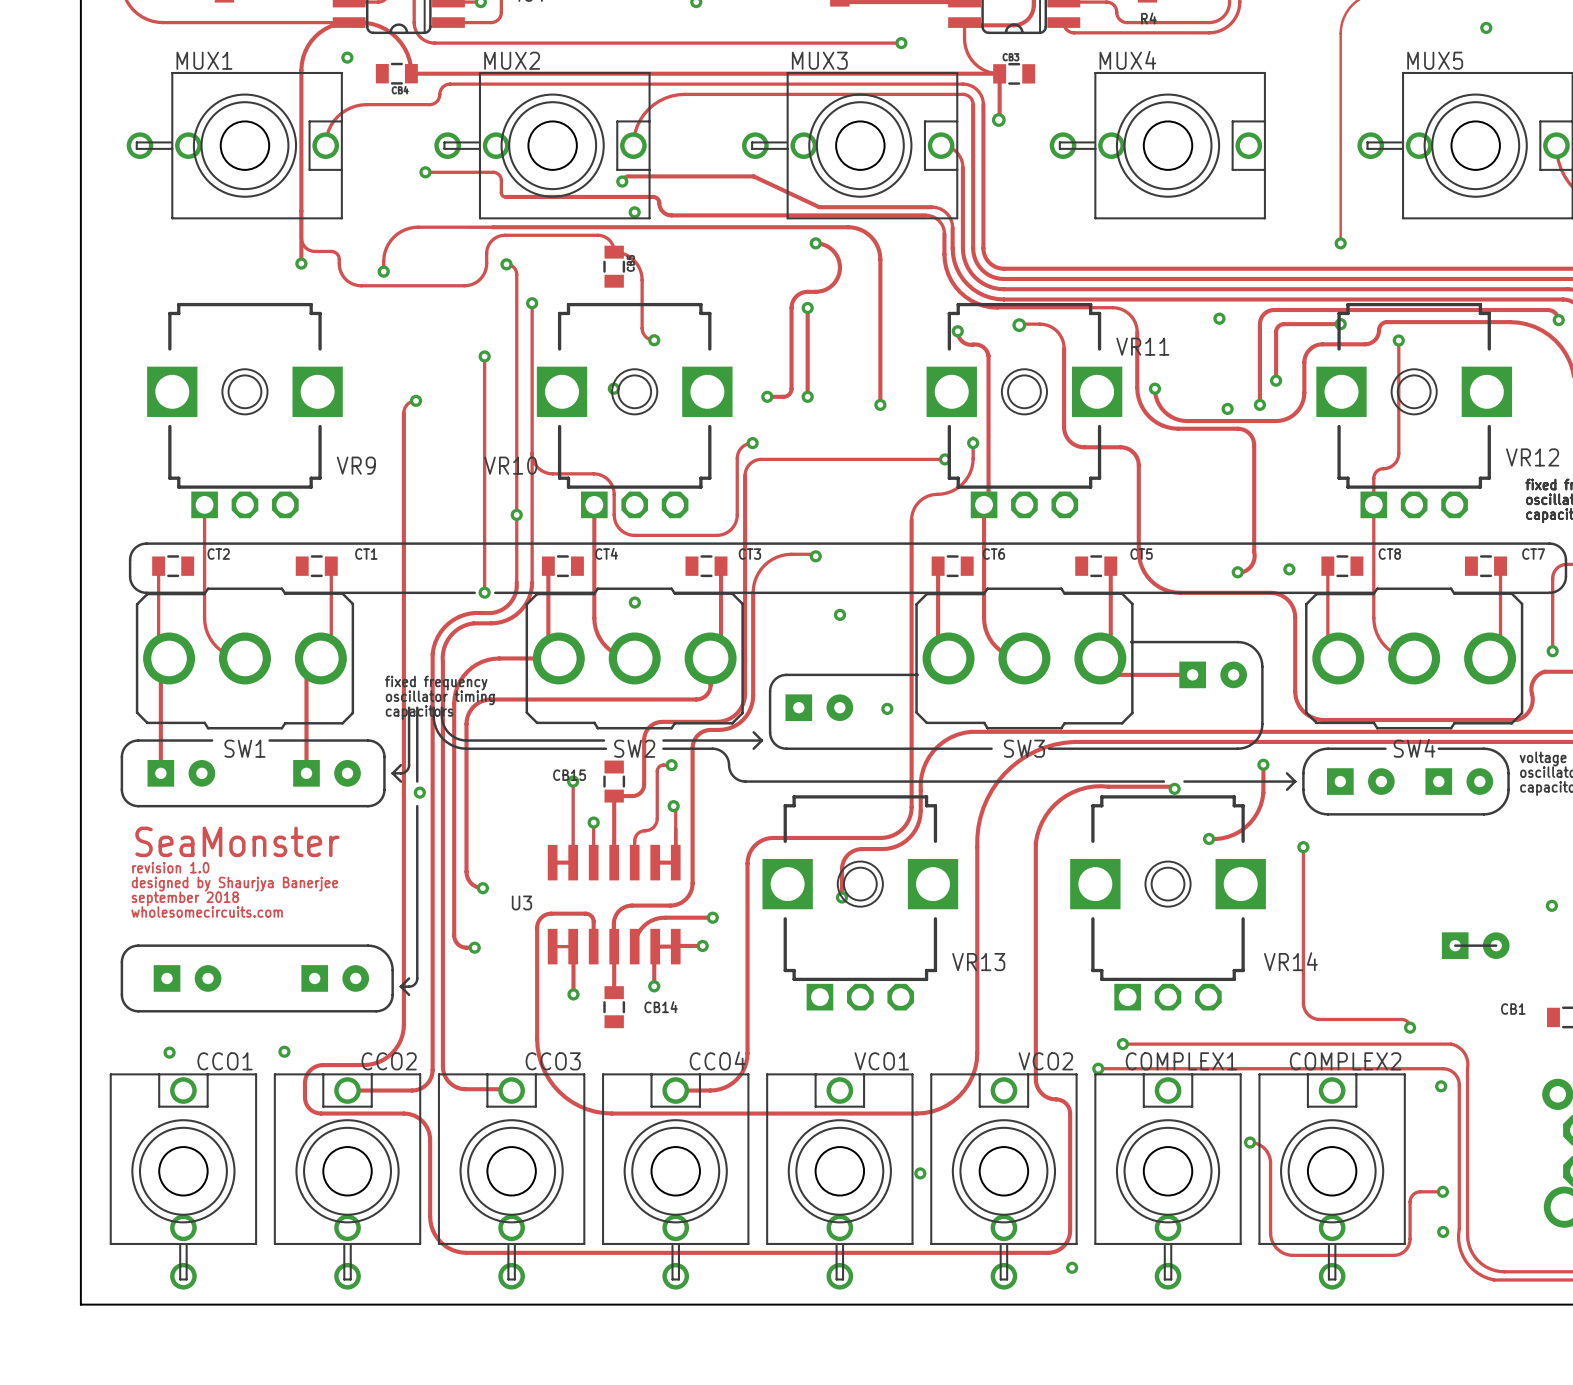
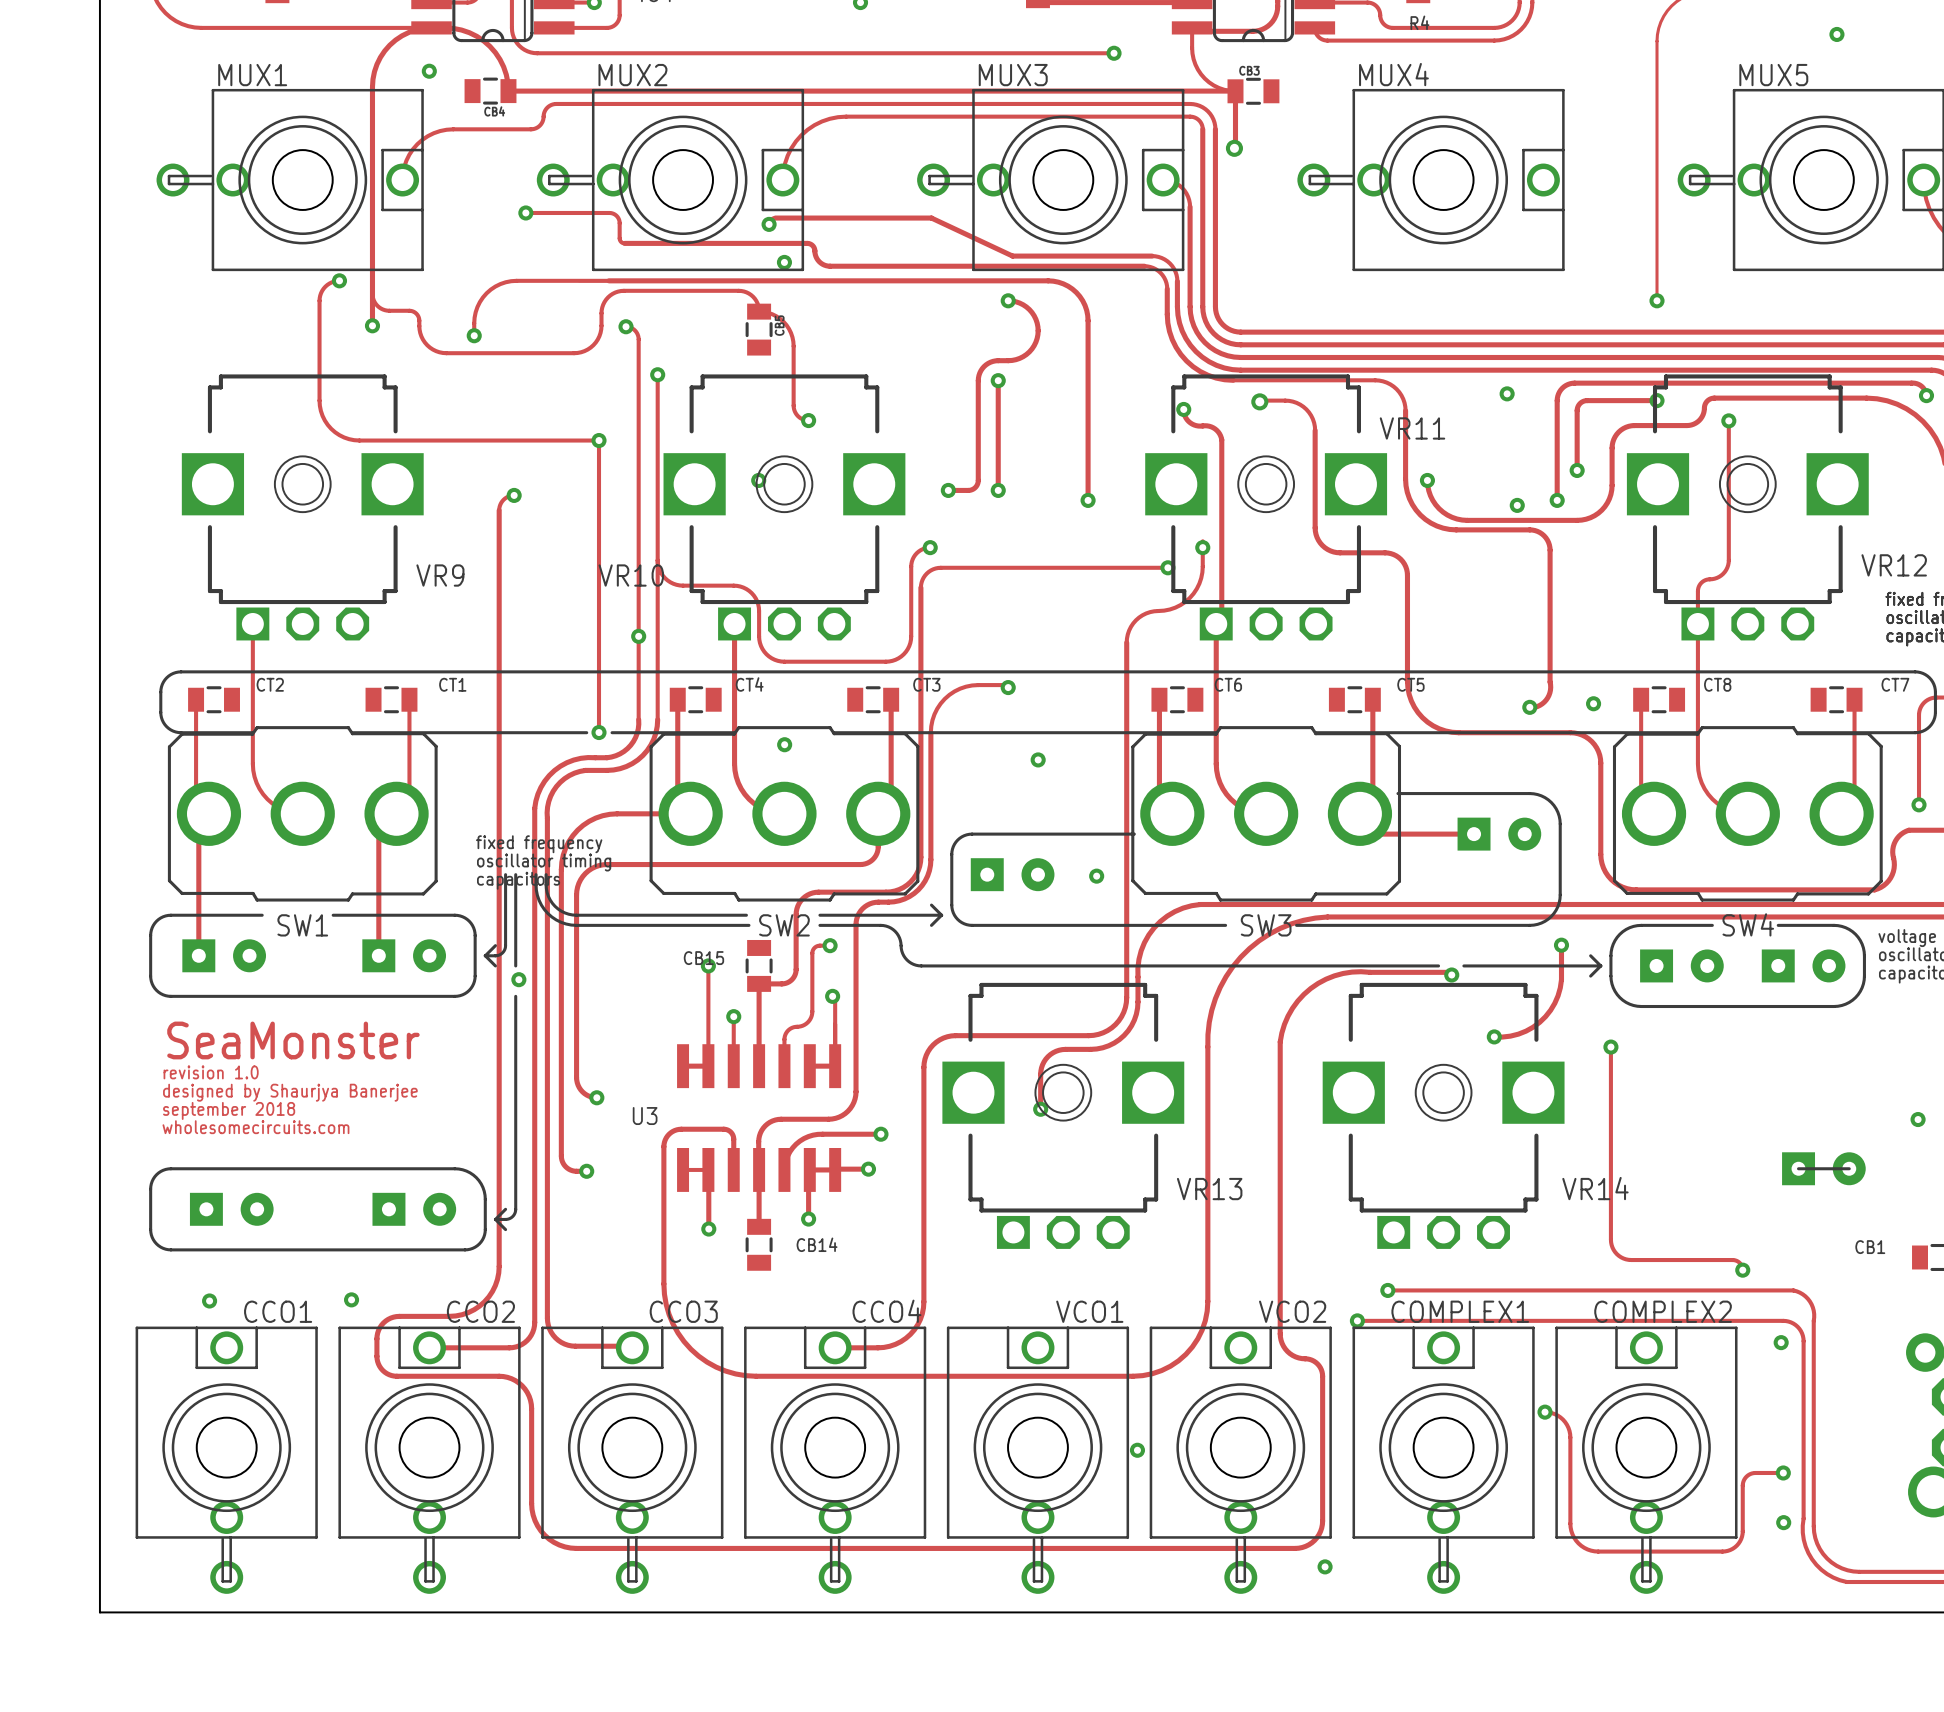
track: none -> (339, 280) (331, 282) (325, 286) (321, 293) (319, 300) (319, 405) (327, 424) (339, 435) (359, 440) (599, 440)
via: none -> (339, 280)

